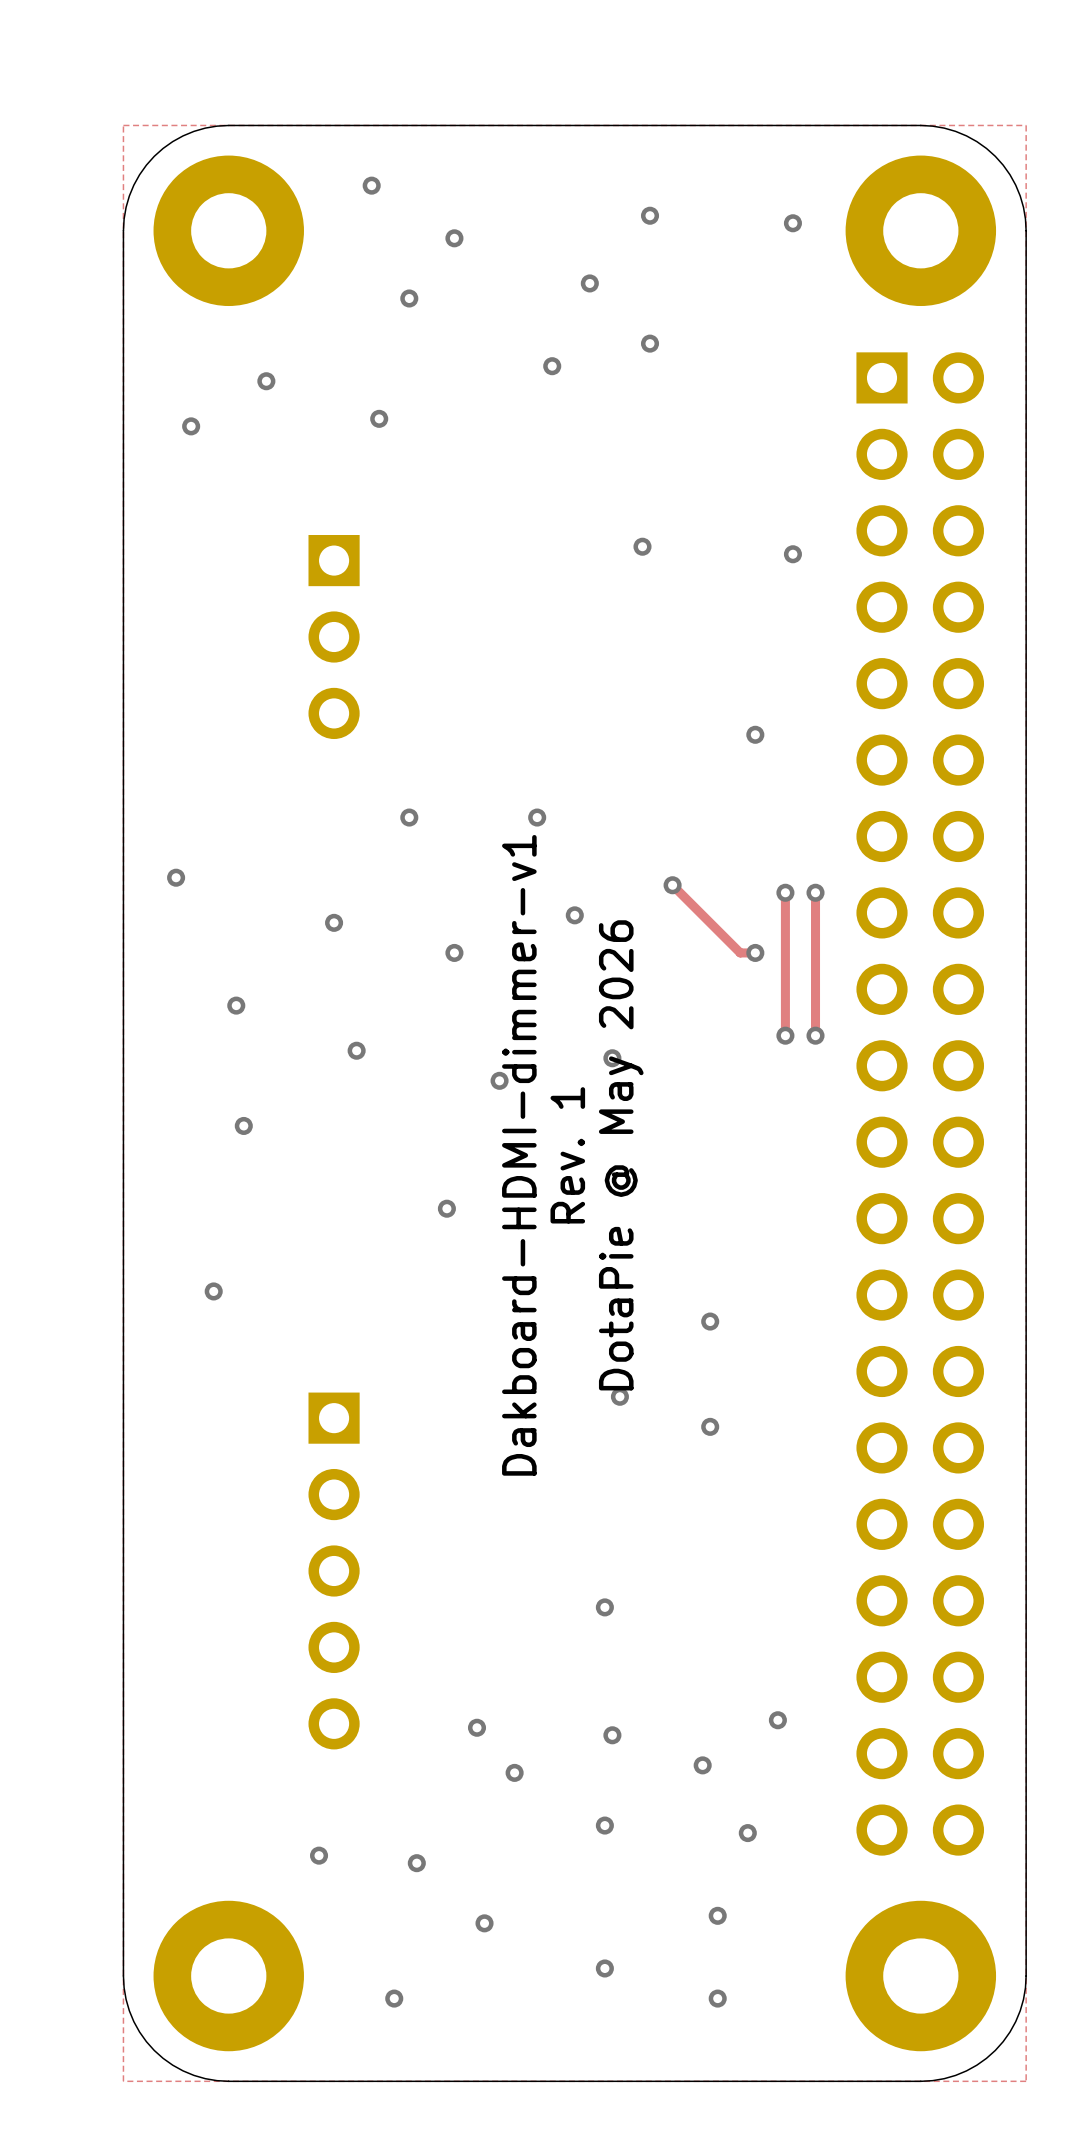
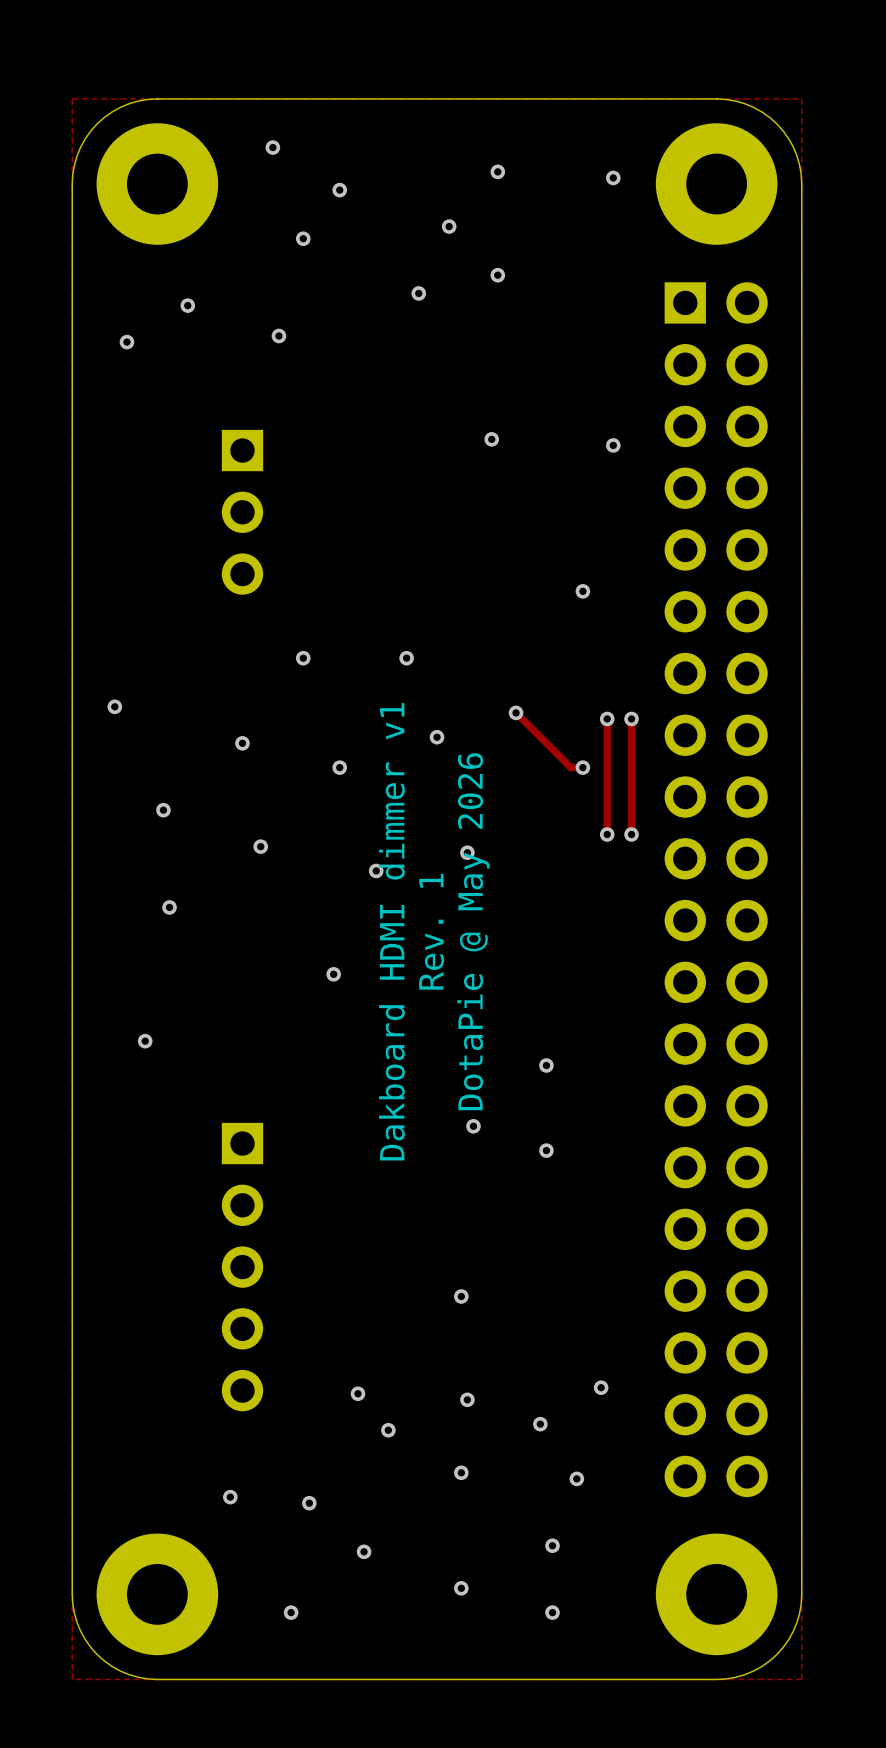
text: Dakboard-HDMI-dimmer-v1 (519, 1155) -> Dakboard HDMI dimmer v1 (391, 931)

